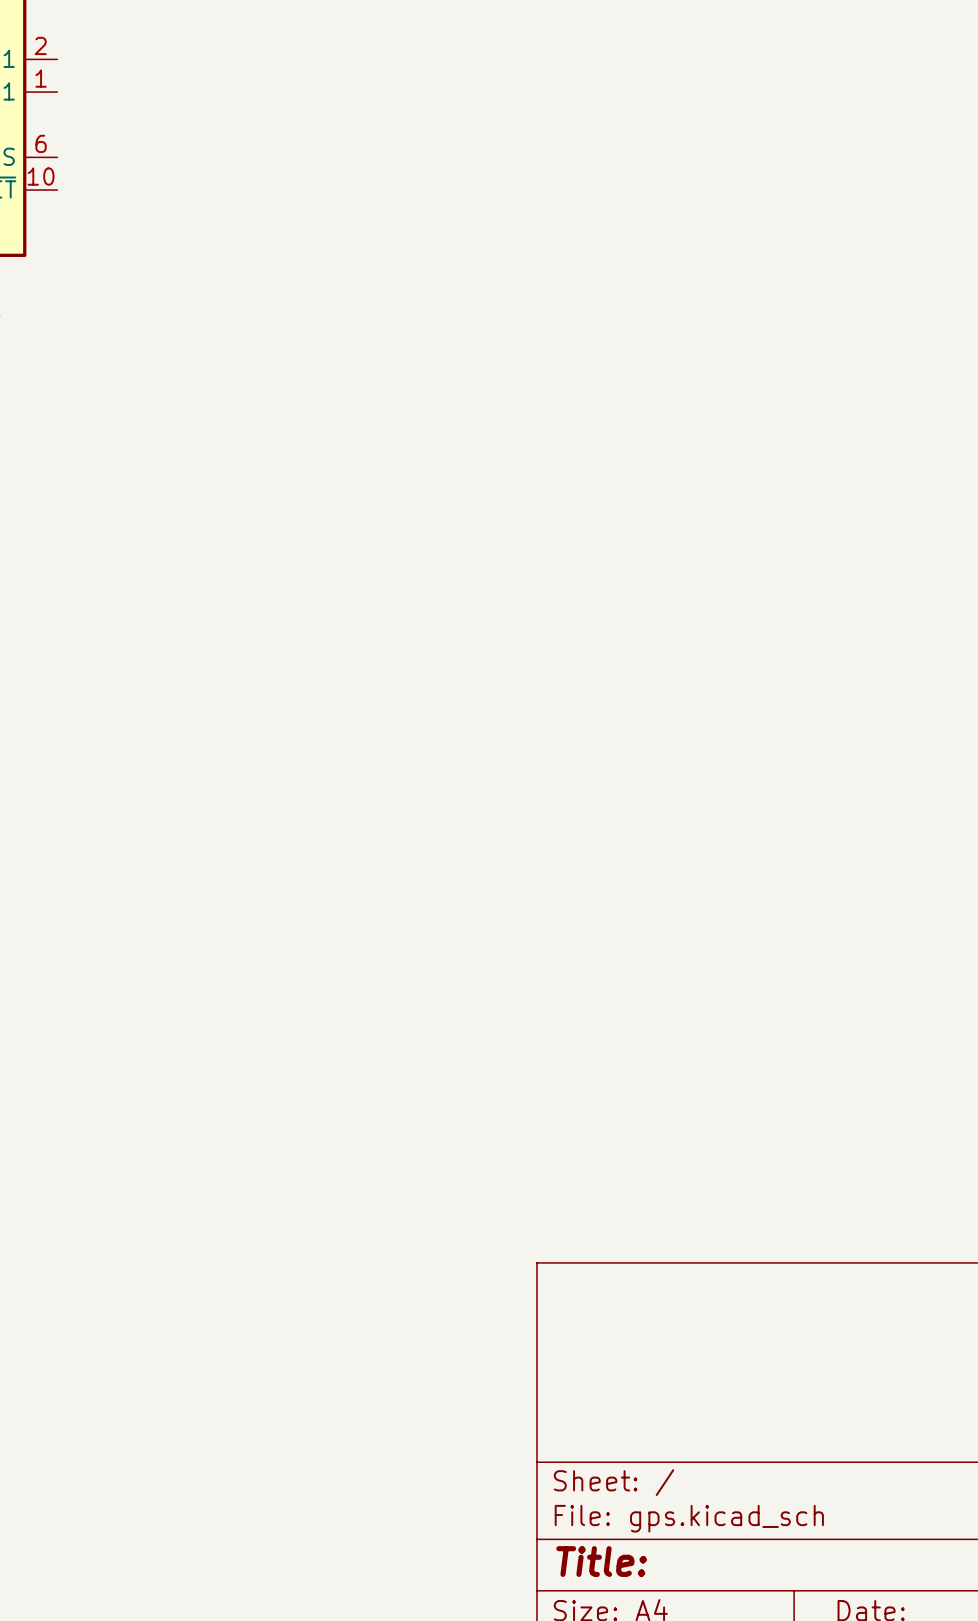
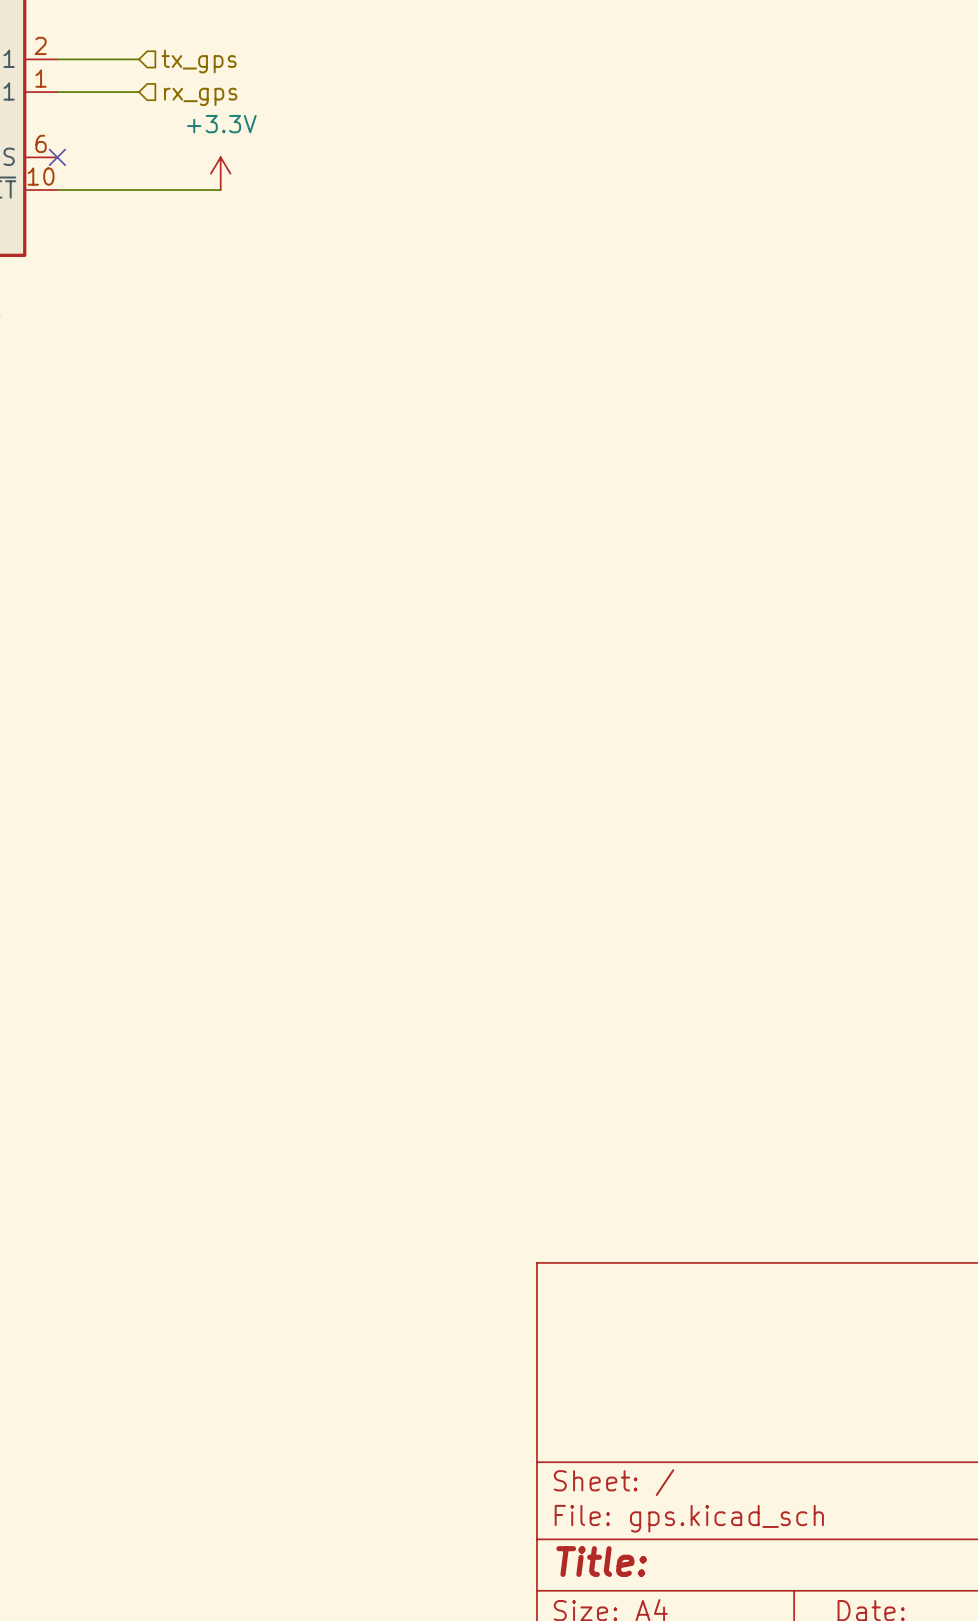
wire: none -> (57, 59) (139, 59)
hierarchical label: none -> tx_gps (199, 61)
wire: none -> (57, 92) (139, 92)
hierarchical label: none -> rx_gps (200, 96)
no-connect mark: none -> (57, 157)
power symbol: none -> +3.3V (220, 173)
wire: none -> (57, 190) (220, 190)

